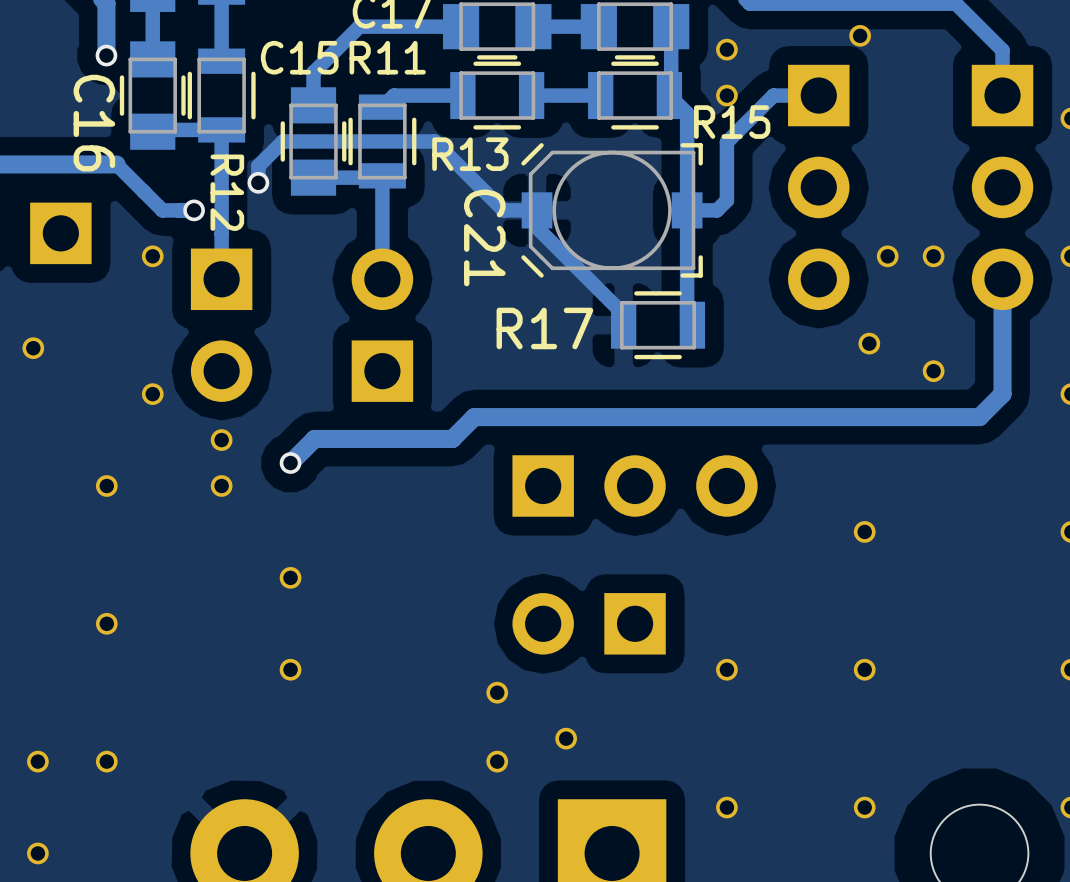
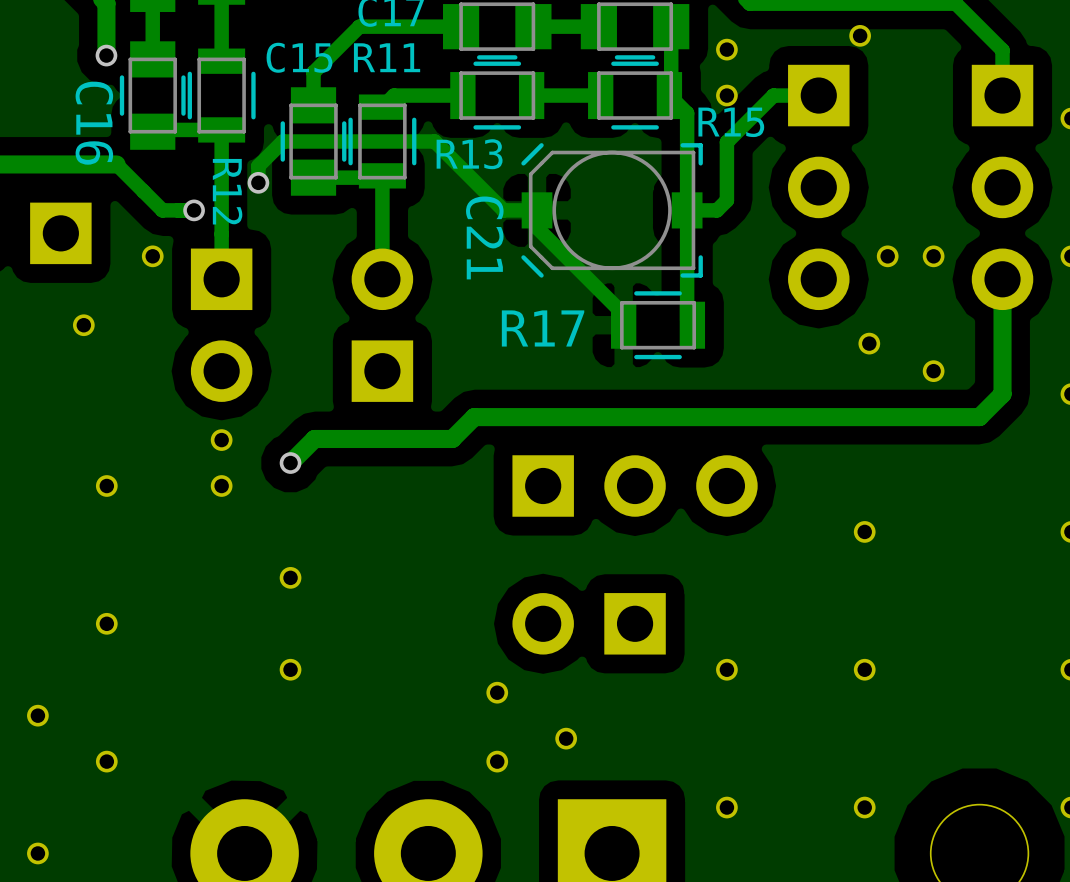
part: none -> (83, 325)
part: (33, 348) -> none
part: (152, 394) -> none
part position: (37, 761) -> (37, 715)

